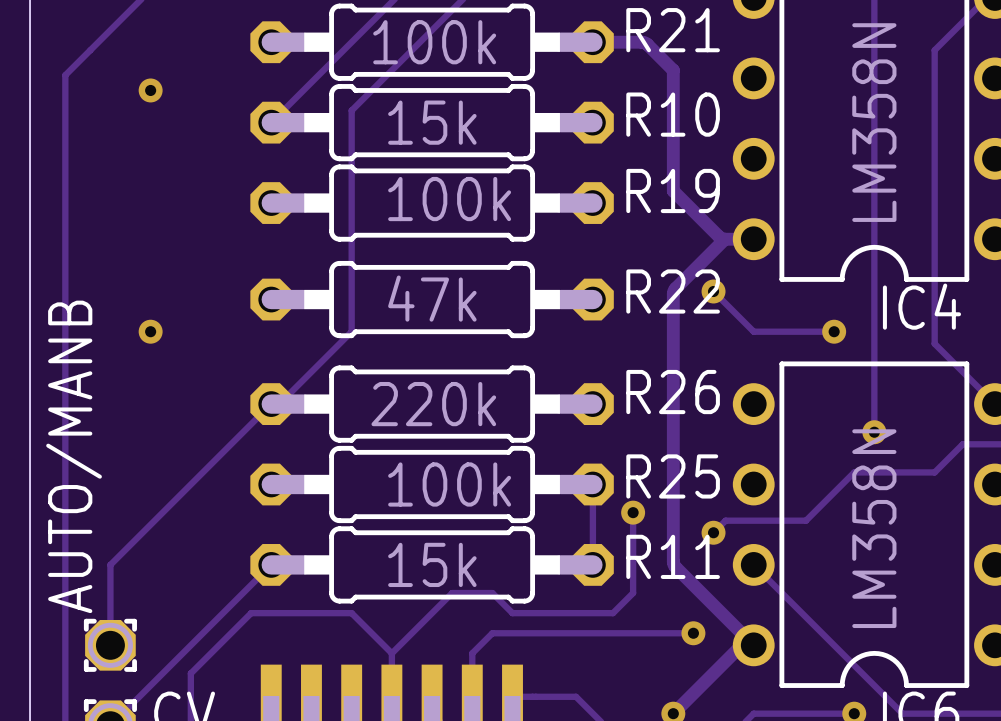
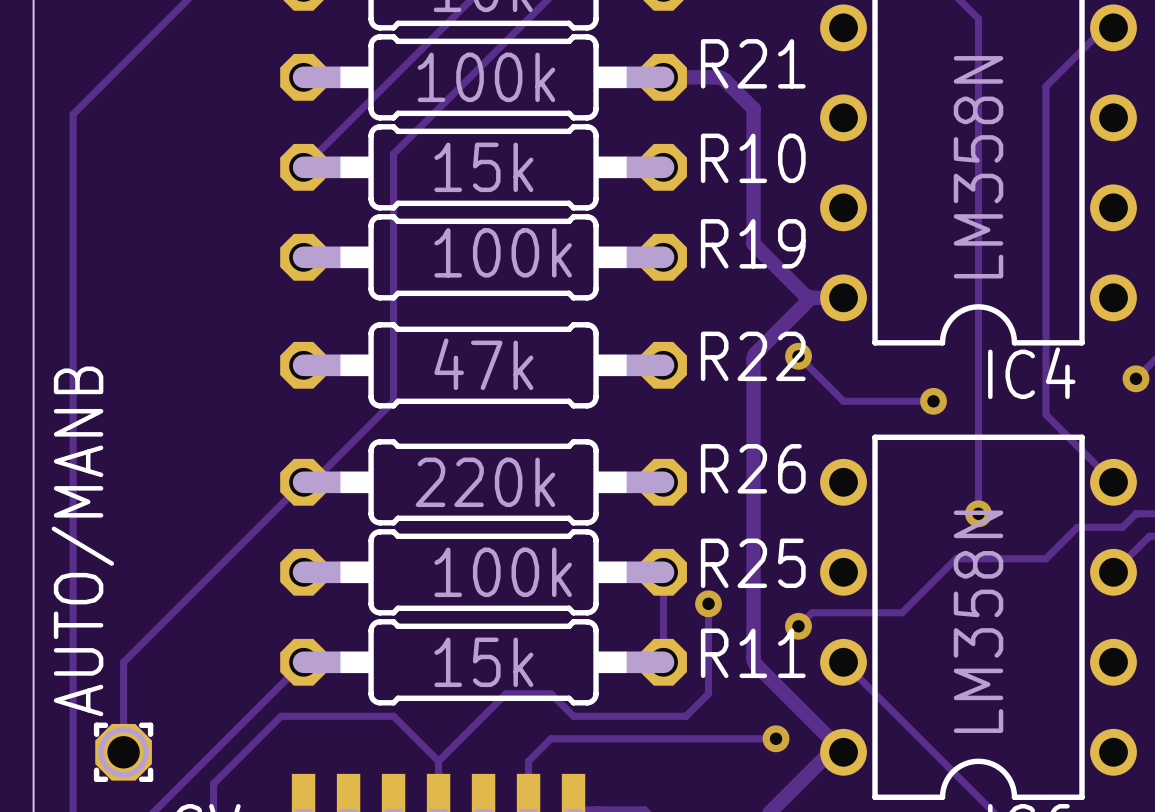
via: (150, 90) -> none
via: (150, 331) -> none

